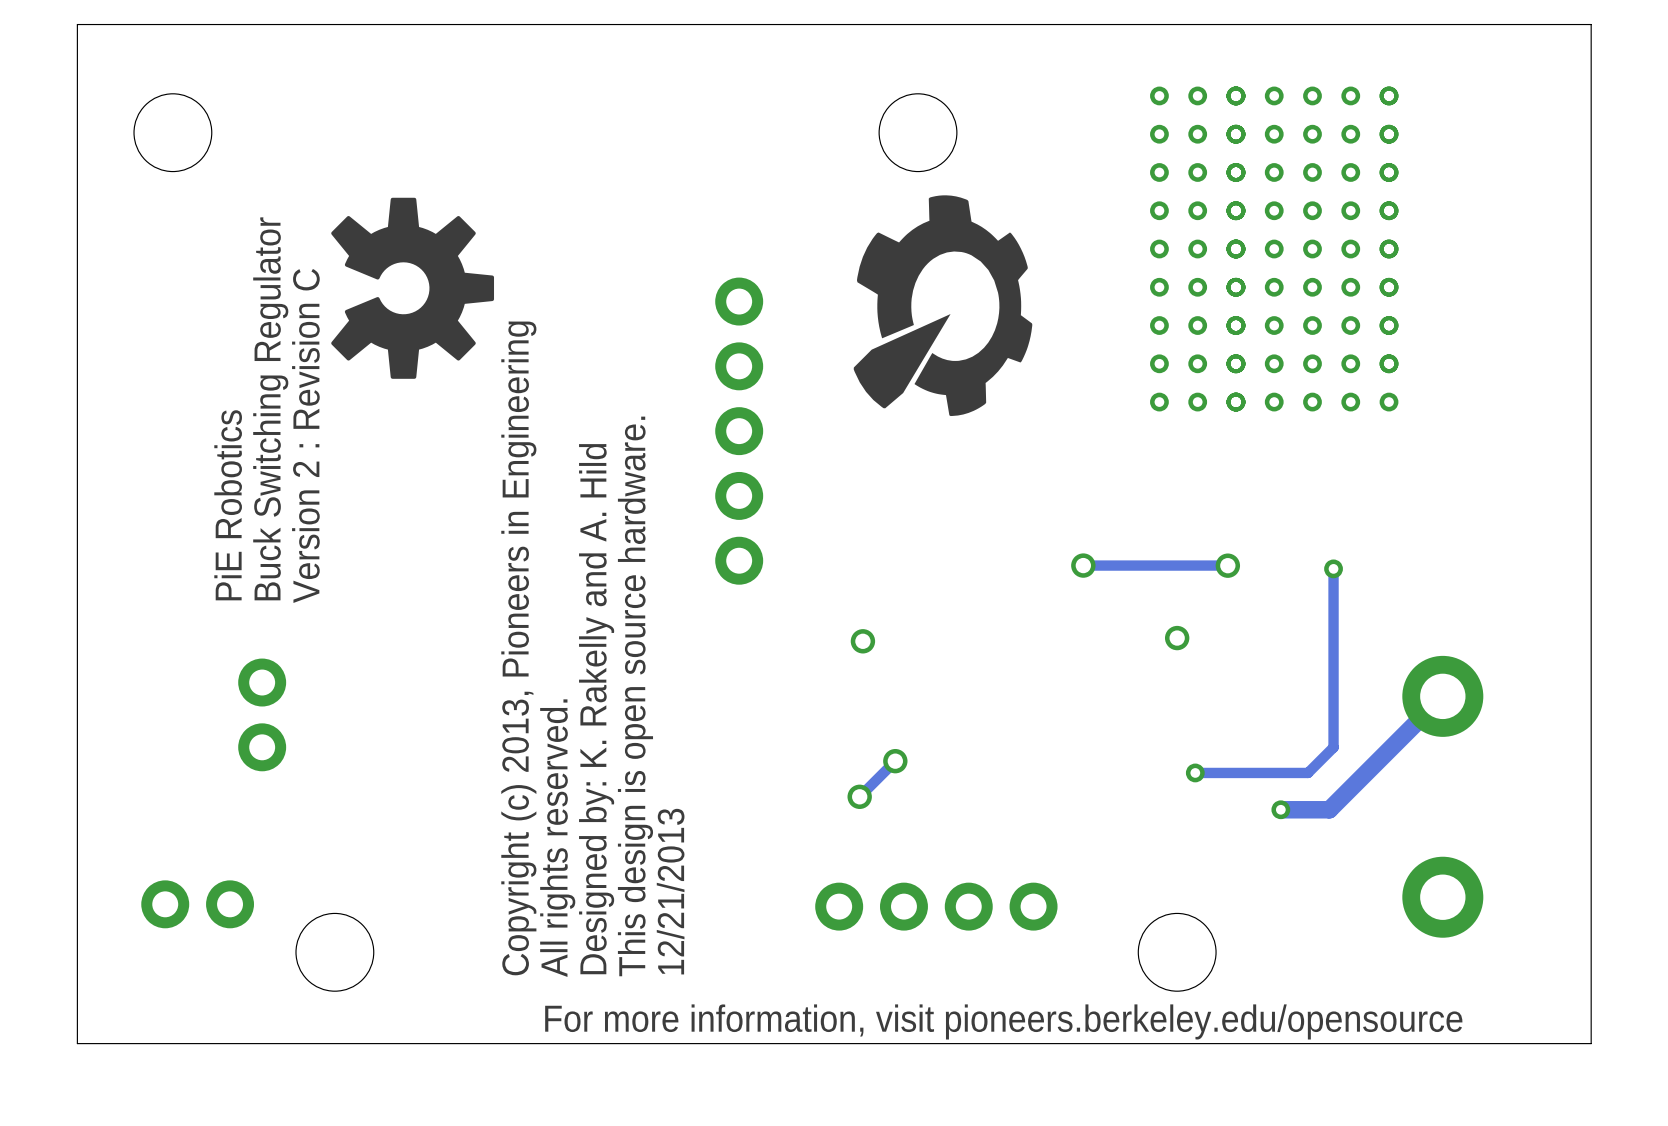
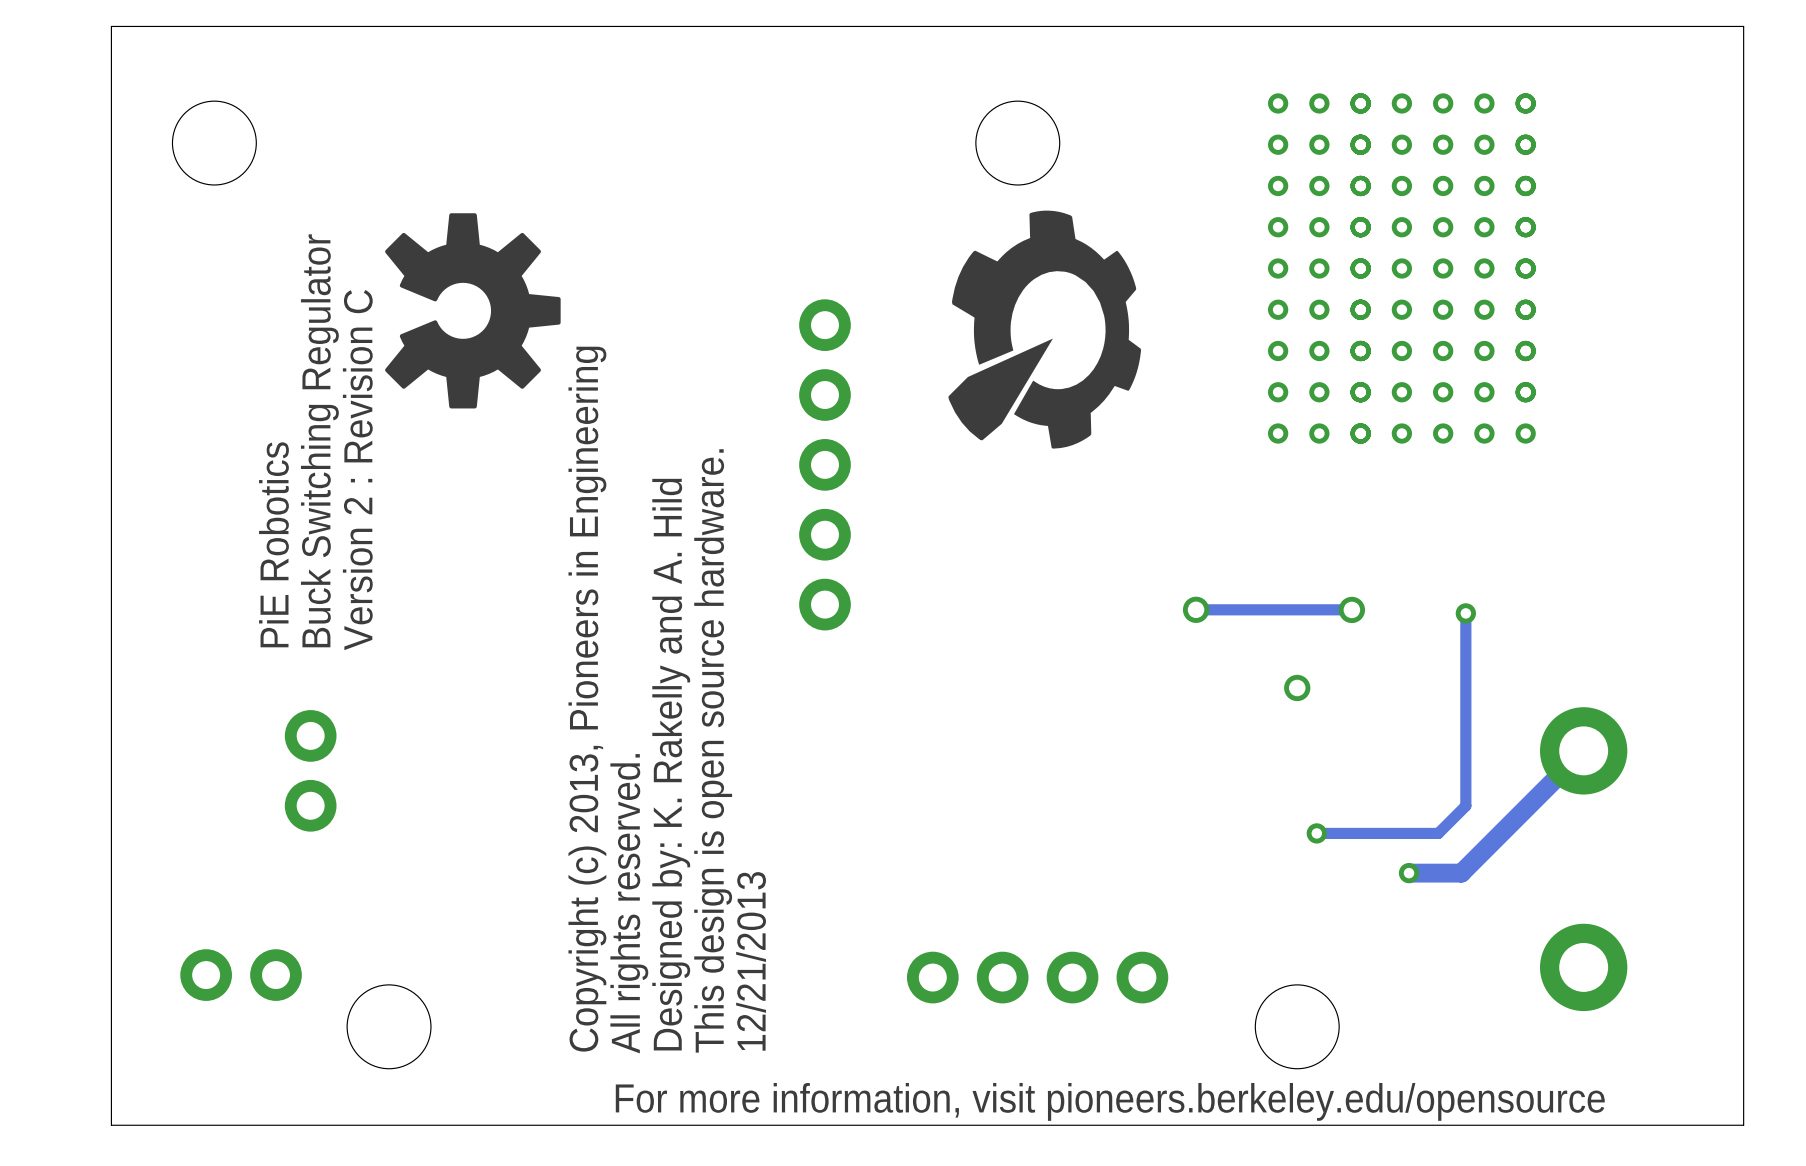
via: (862, 641) -> none
track: (895, 761) (859, 796) -> none
via: (895, 761) -> none
via: (859, 796) -> none

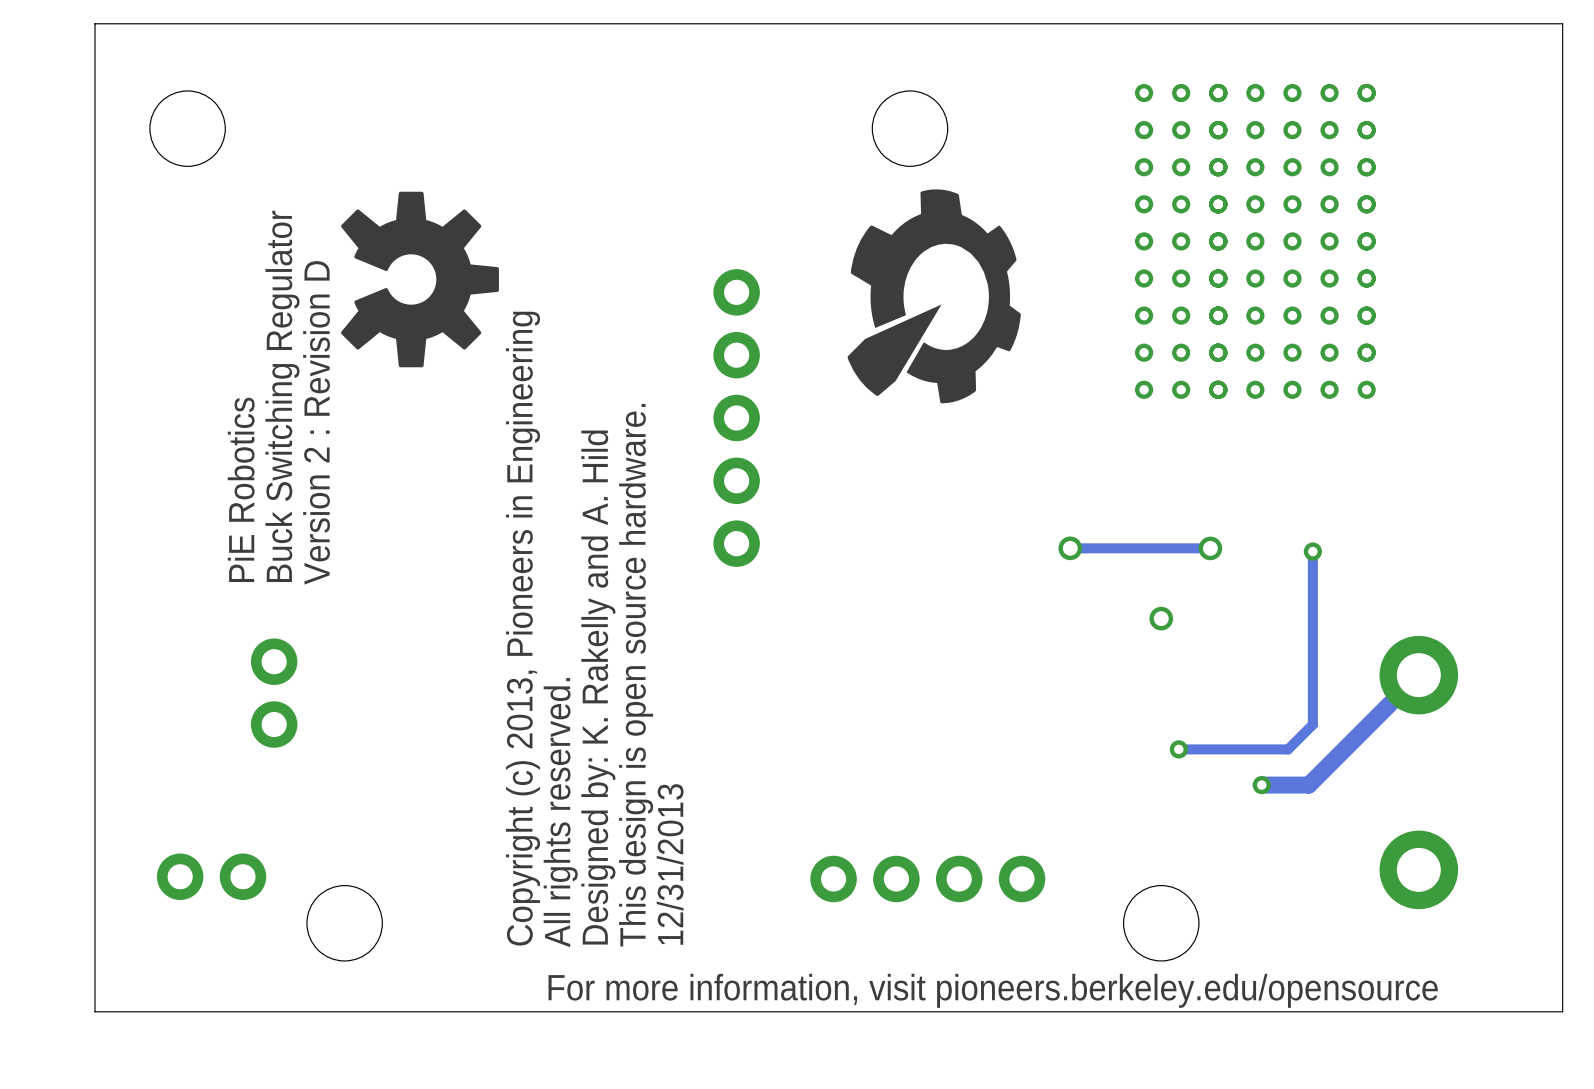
text: Version 2 : Revision C (357, 470) -> Version 2 : Revision D (316, 422)
text: 12/21/2013 (751, 961) -> 12/31/2013 (670, 864)

